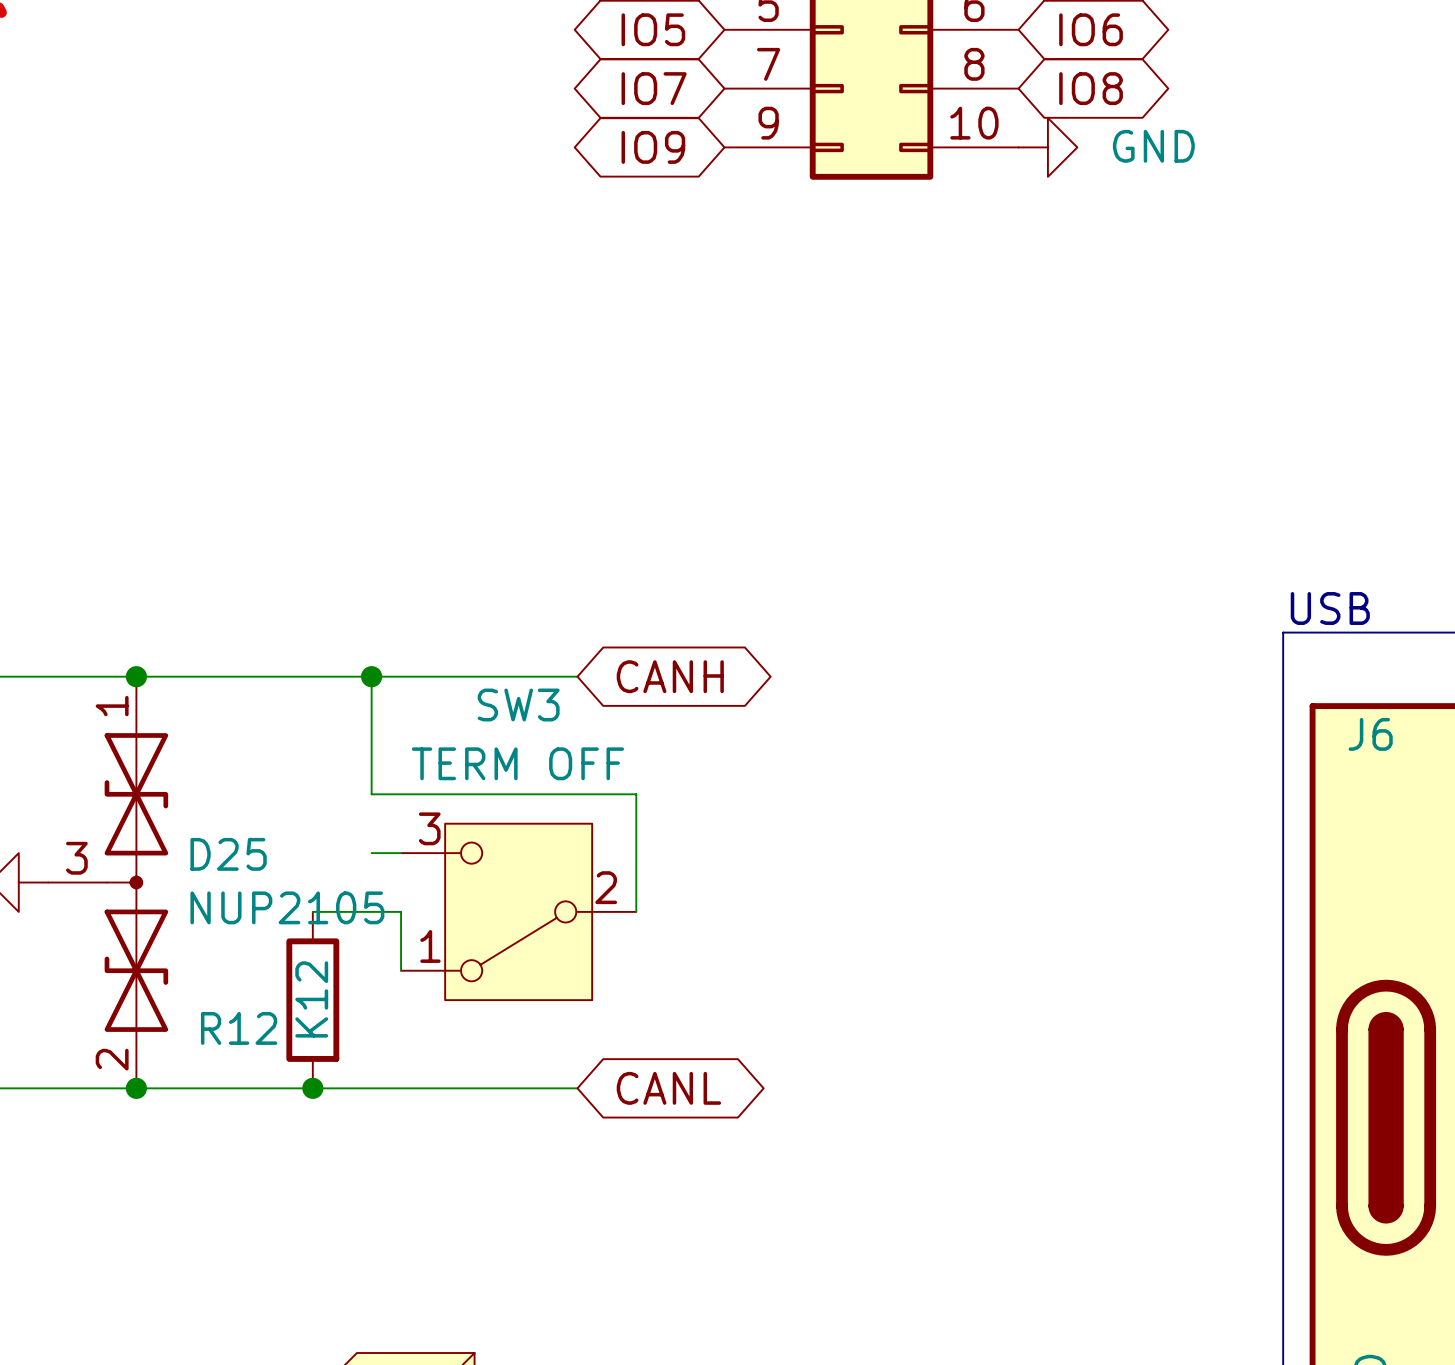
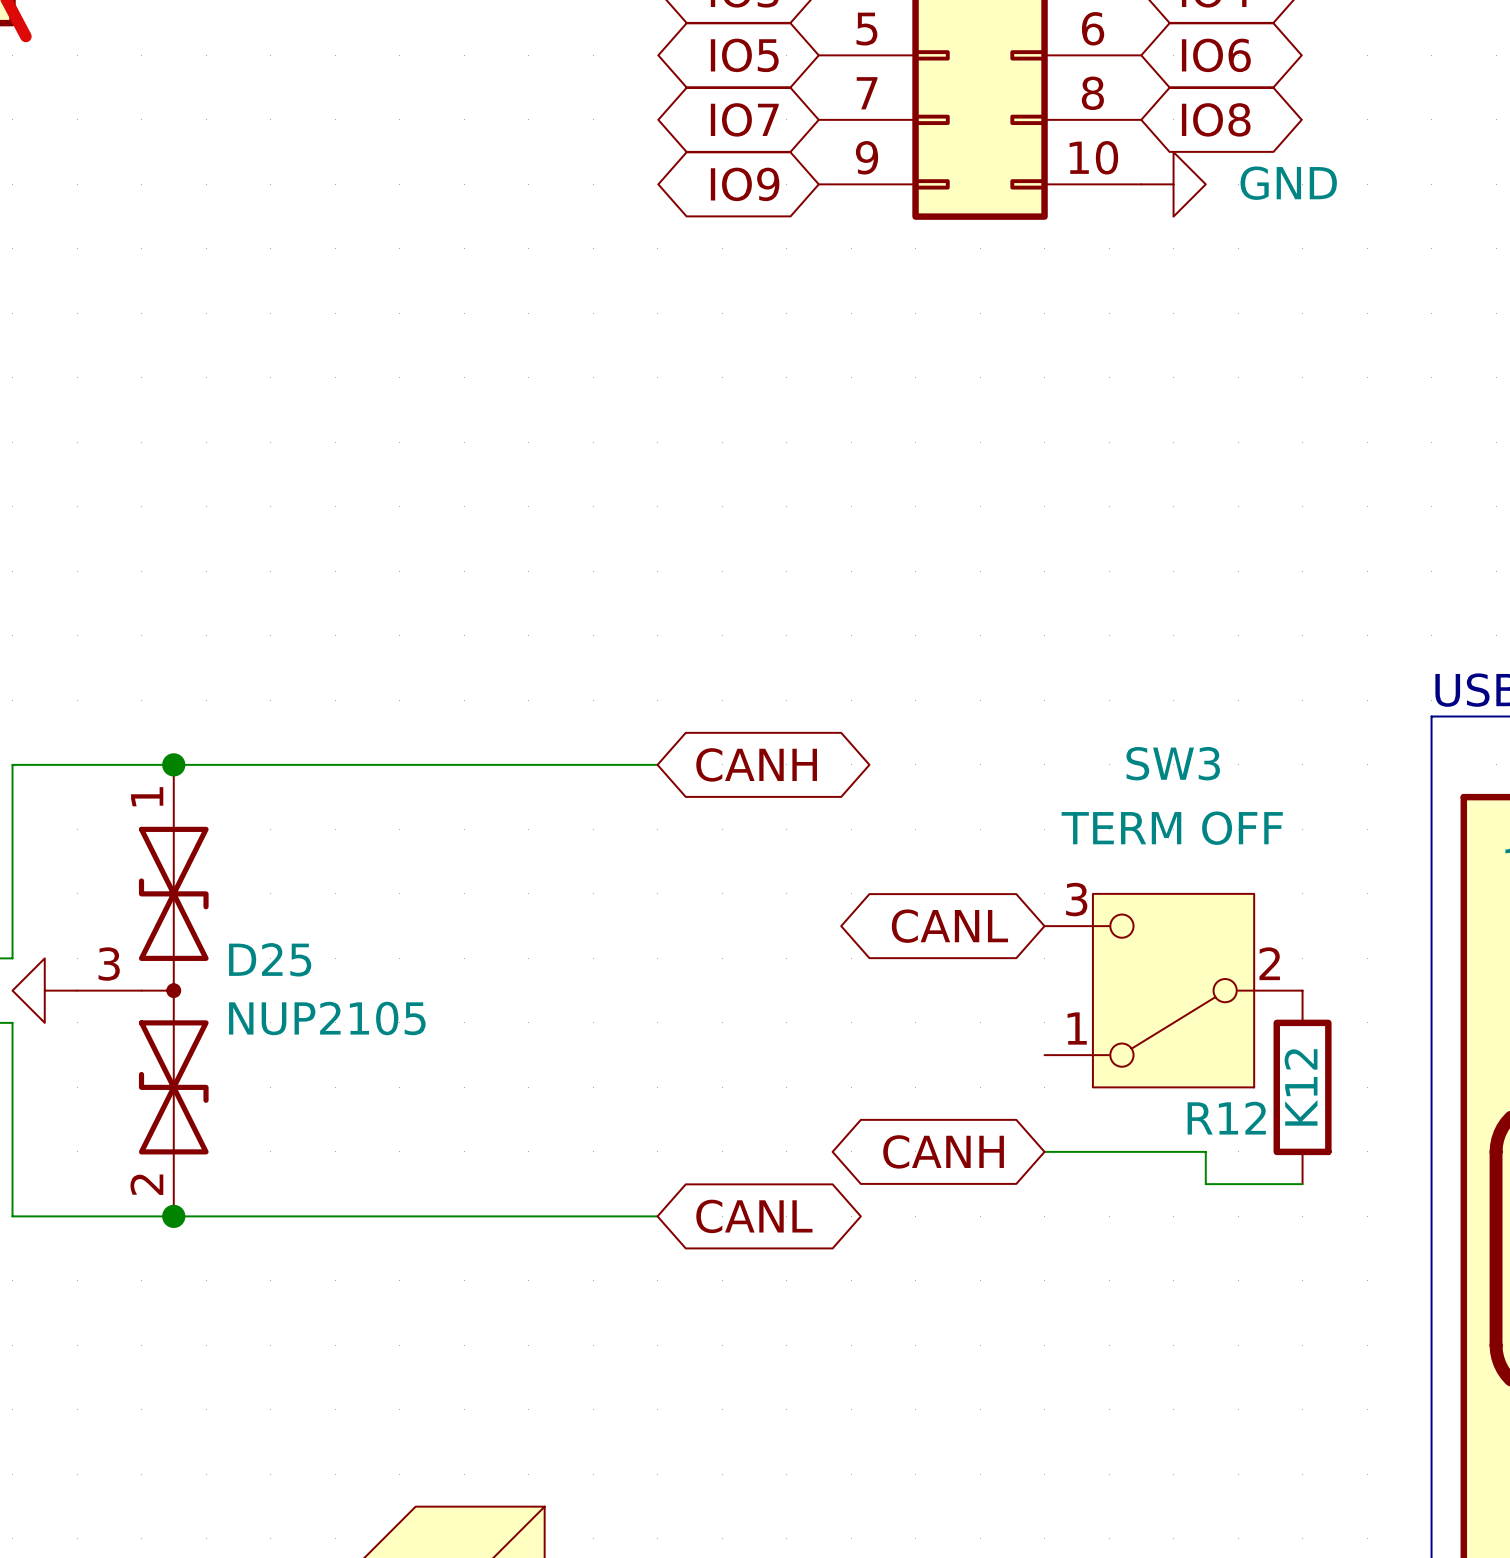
wire: (371, 676) (371, 794) (636, 794) (636, 911) -> none
junction: (371, 676) -> none
global label: none -> CANL (949, 926)
wire: (371, 853) (401, 853) -> none
wire: (312, 911) (401, 911) (401, 970) -> none
SW3 position: (518, 911) -> (1173, 990)
R12 position: (312, 1000) -> (1302, 1087)
global label: none -> CANH (943, 1151)
wire: none -> (1044, 1151) (1205, 1151) (1205, 1184) (1302, 1184)
junction: (312, 1088) -> none

